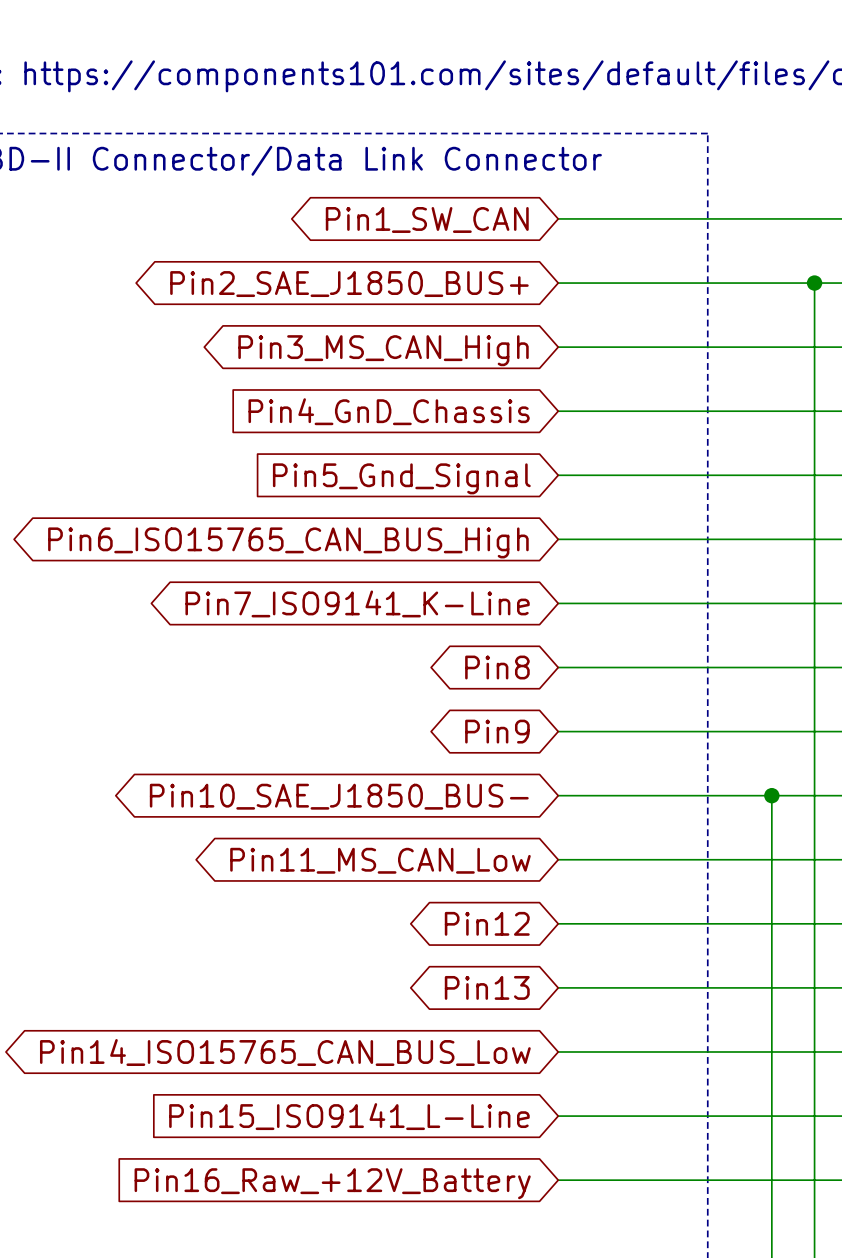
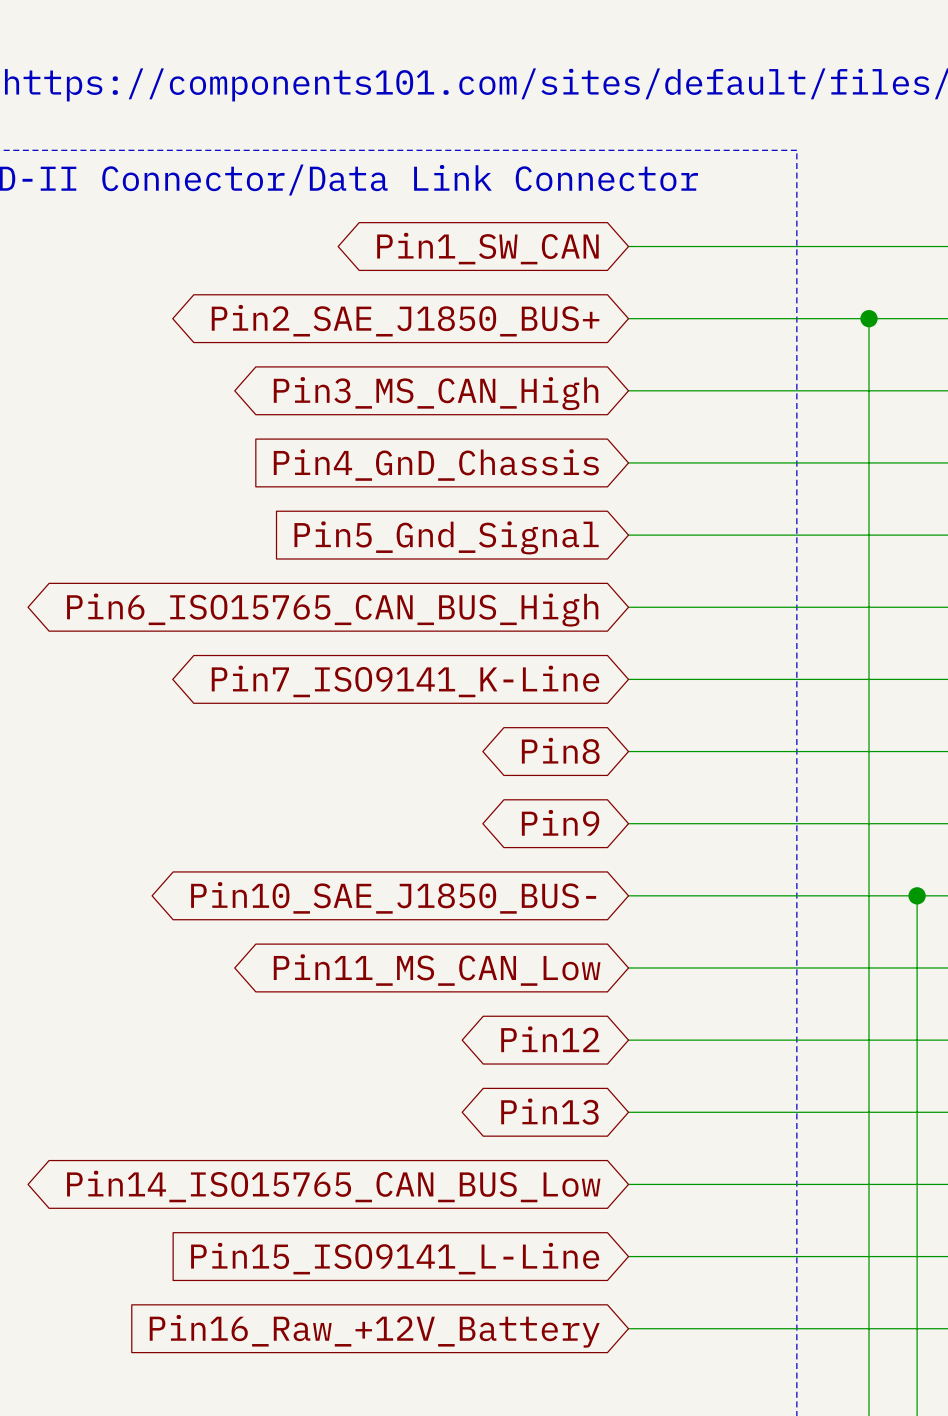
wire: (814, 283) (814, 795) -> (869, 318) (869, 895)
junction position: (814, 283) -> (869, 318)
junction position: (771, 795) -> (917, 895)

